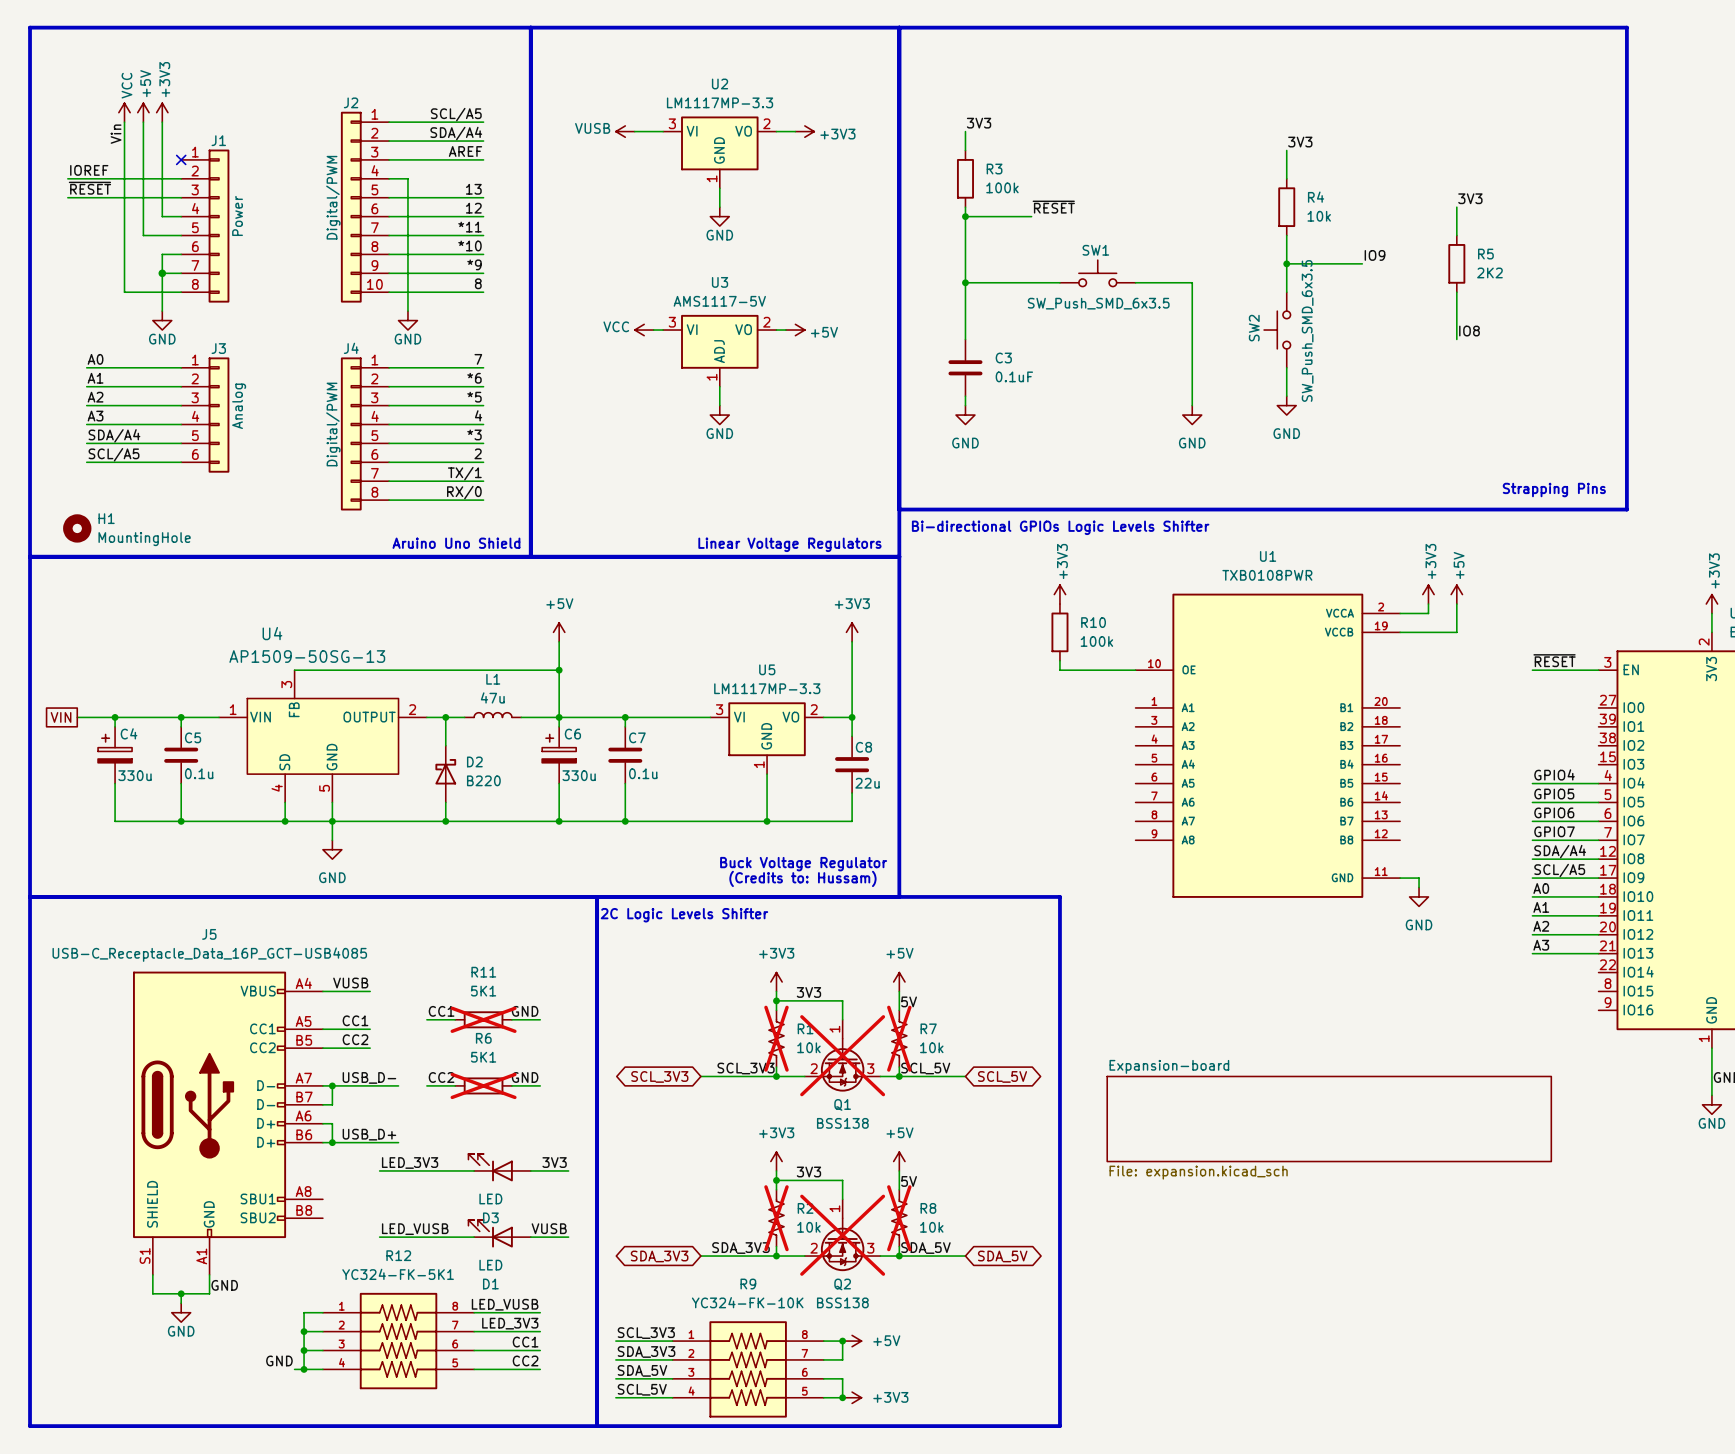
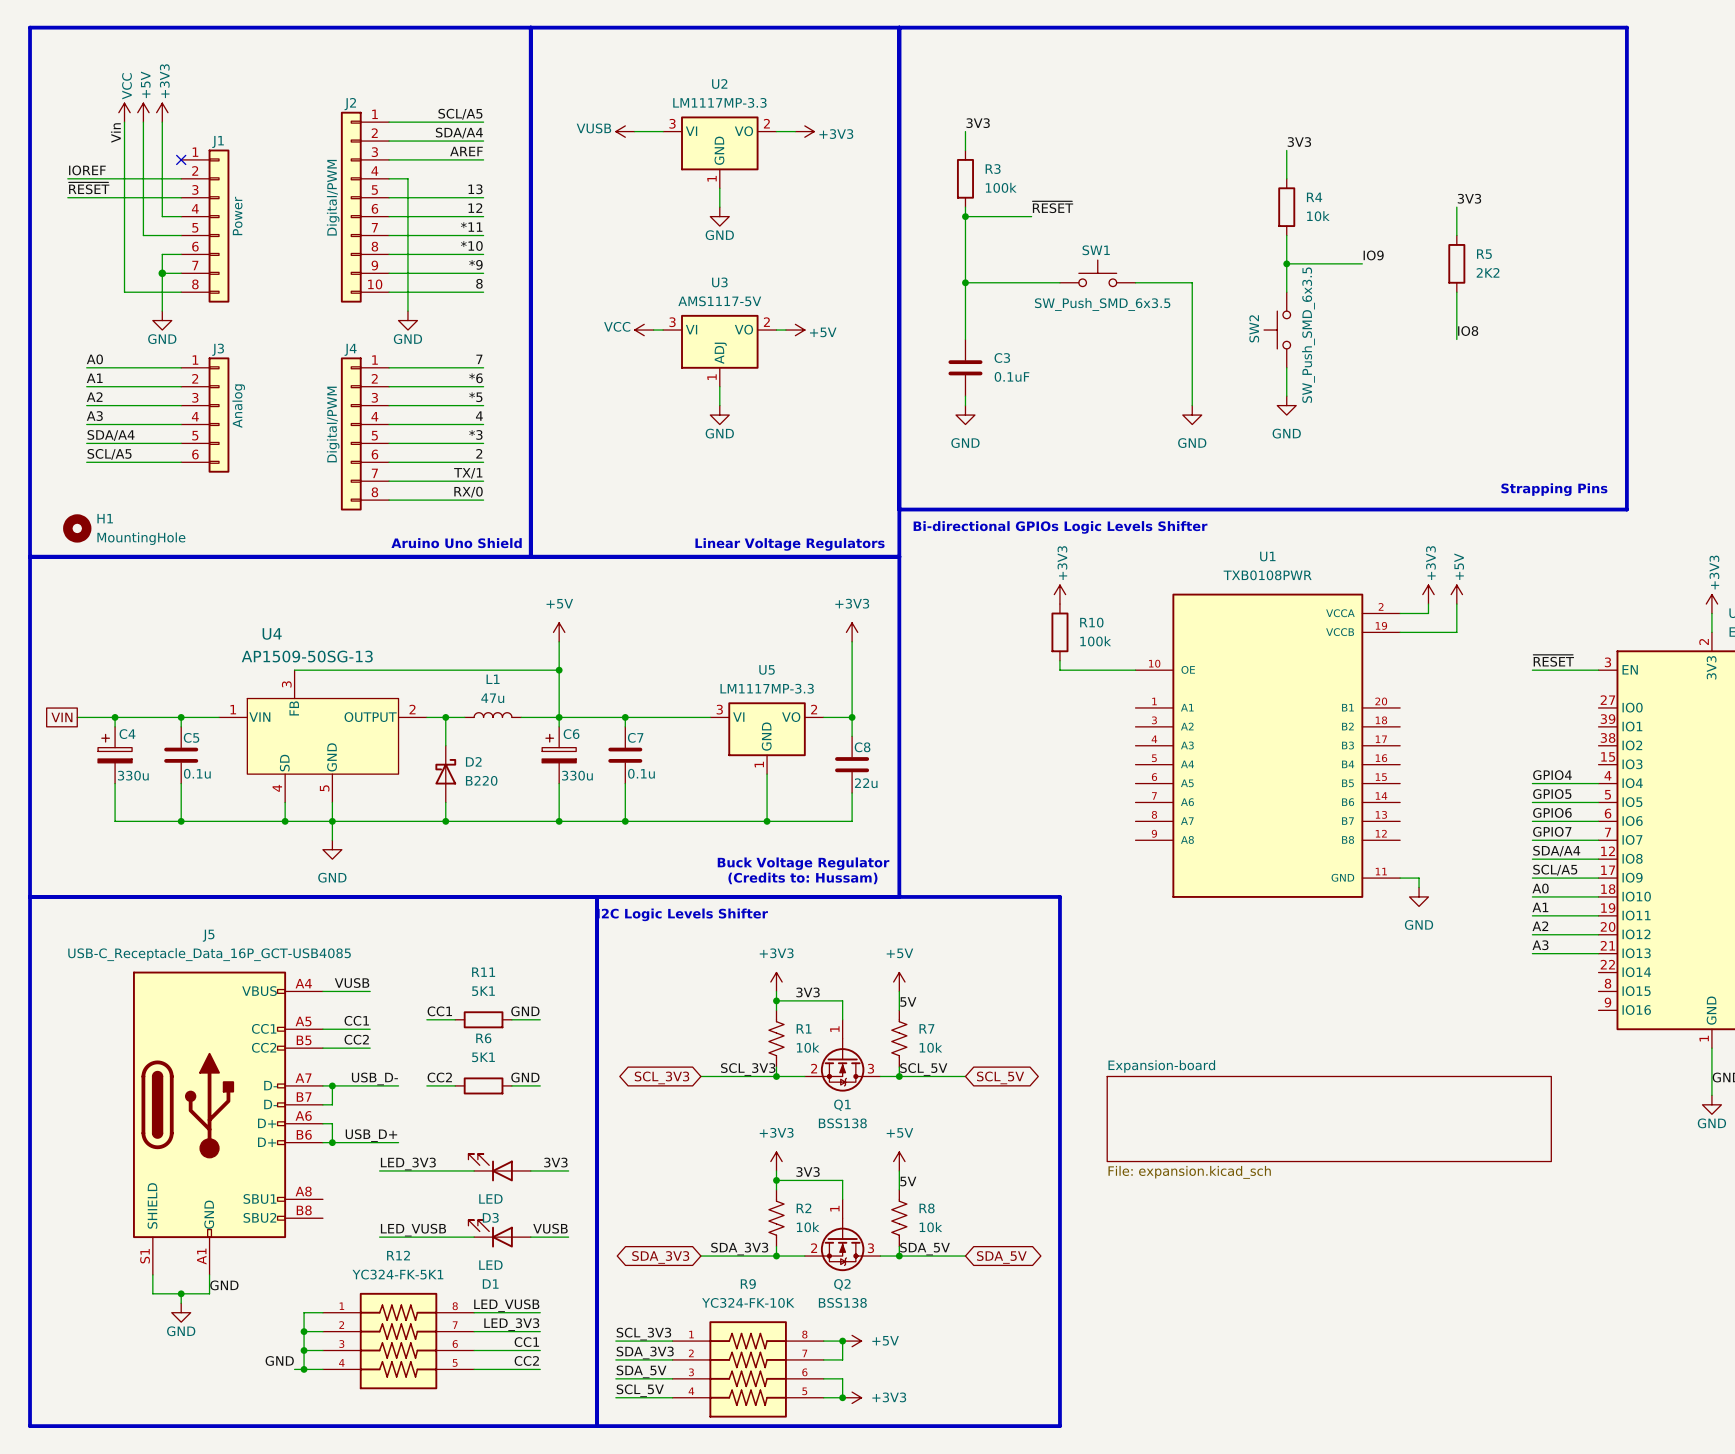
R11 do-not-place cross: (483, 1019) -> none
R1 do-not-place cross: (776, 1038) -> none
R7 do-not-place cross: (899, 1038) -> none
Q1 do-not-place cross: (842, 1055) -> none
R6 do-not-place cross: (483, 1085) -> none
R2 do-not-place cross: (776, 1218) -> none
R8 do-not-place cross: (899, 1218) -> none
Q2 do-not-place cross: (842, 1235) -> none

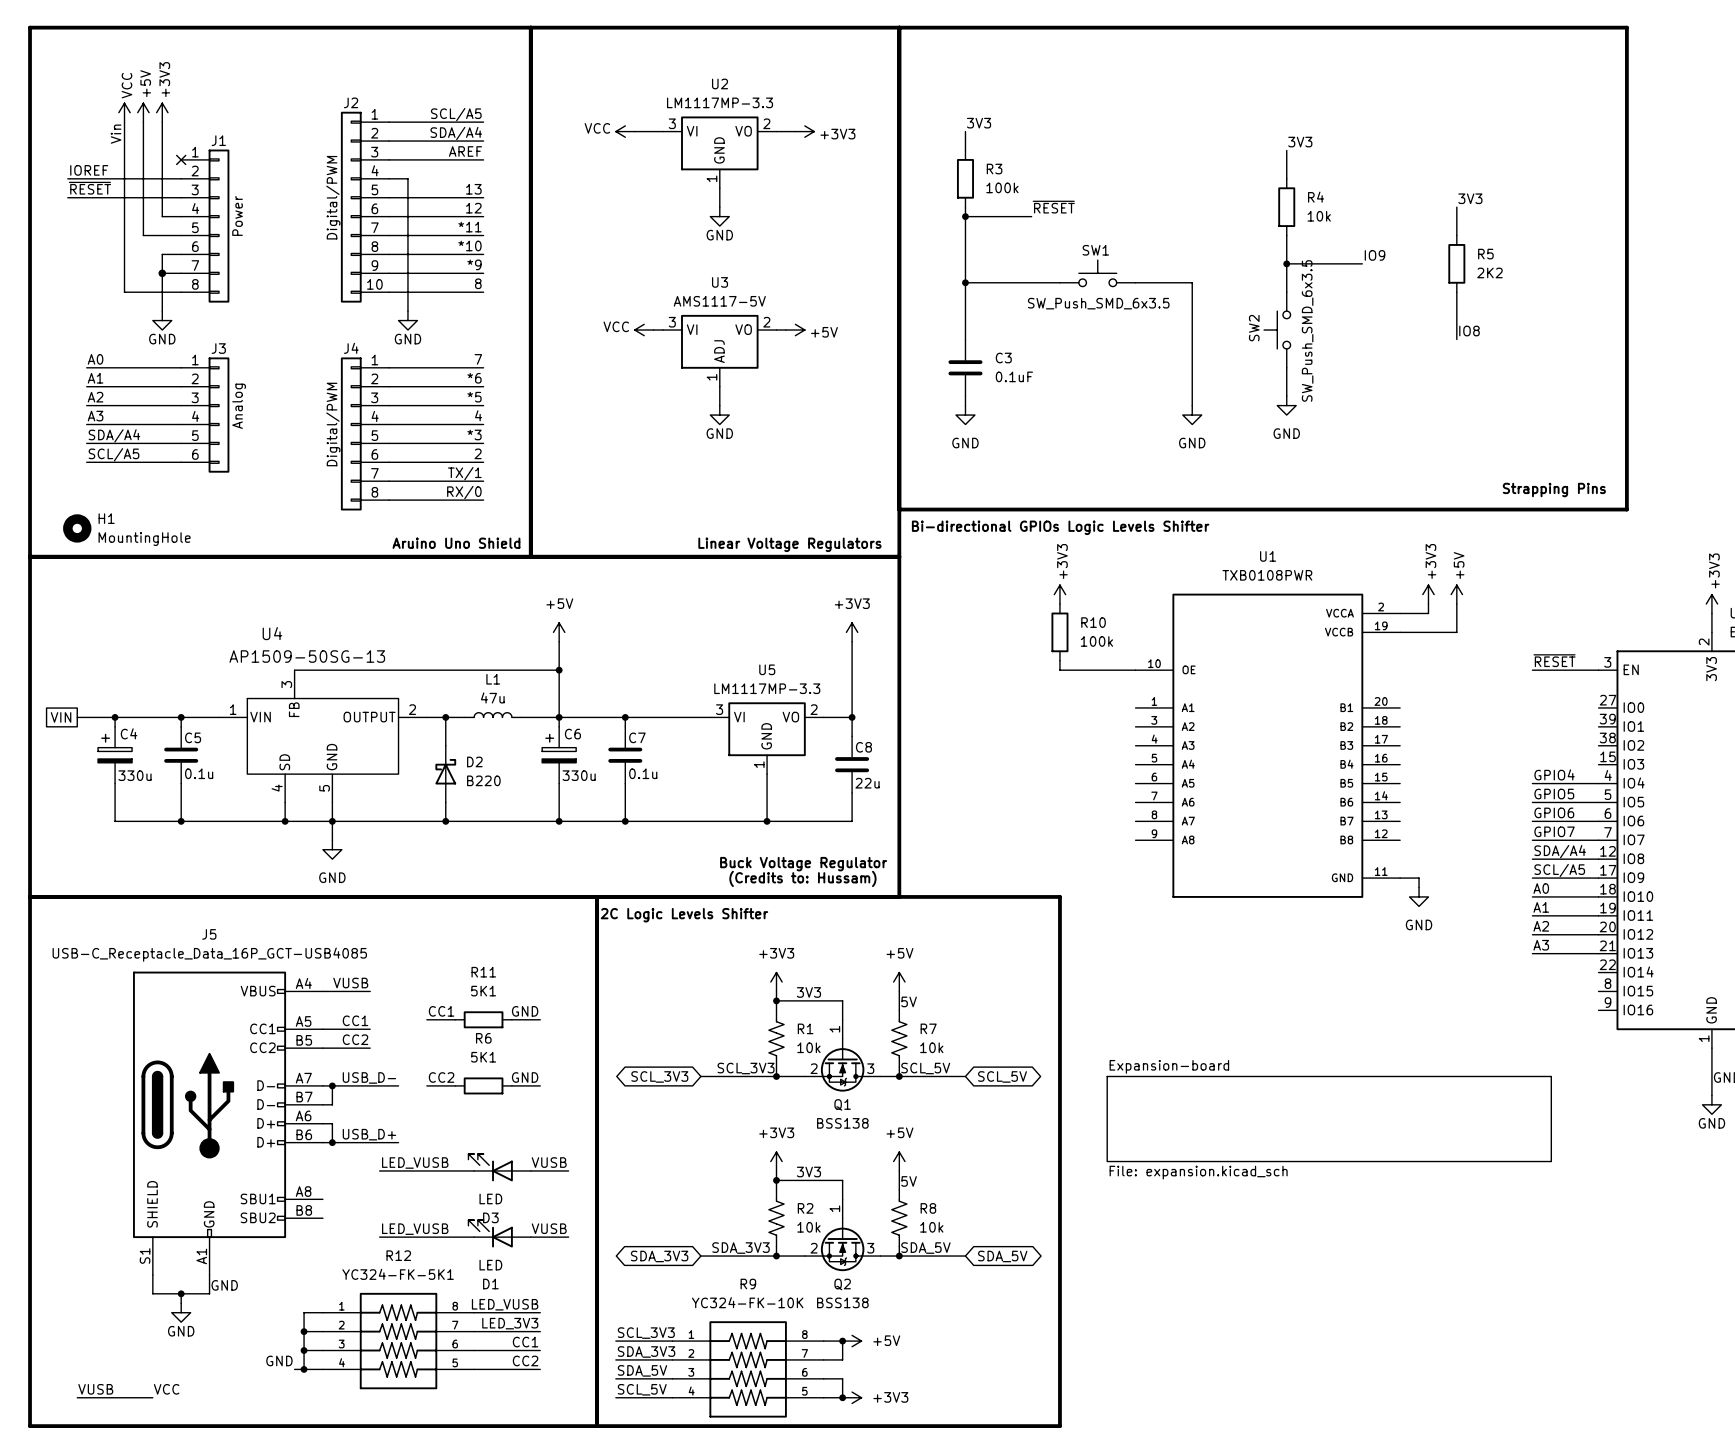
power symbol: VUSB (625, 131) -> VCC (625, 131)
label: 3V3 (555, 1162) -> VUSB (549, 1162)
label: LED_3V3 (408, 1163) -> LED_VUSB (415, 1162)
label: none -> VUSB (95, 1389)
label: none -> VCC (166, 1389)
wire: none -> (77, 1397) (152, 1397)

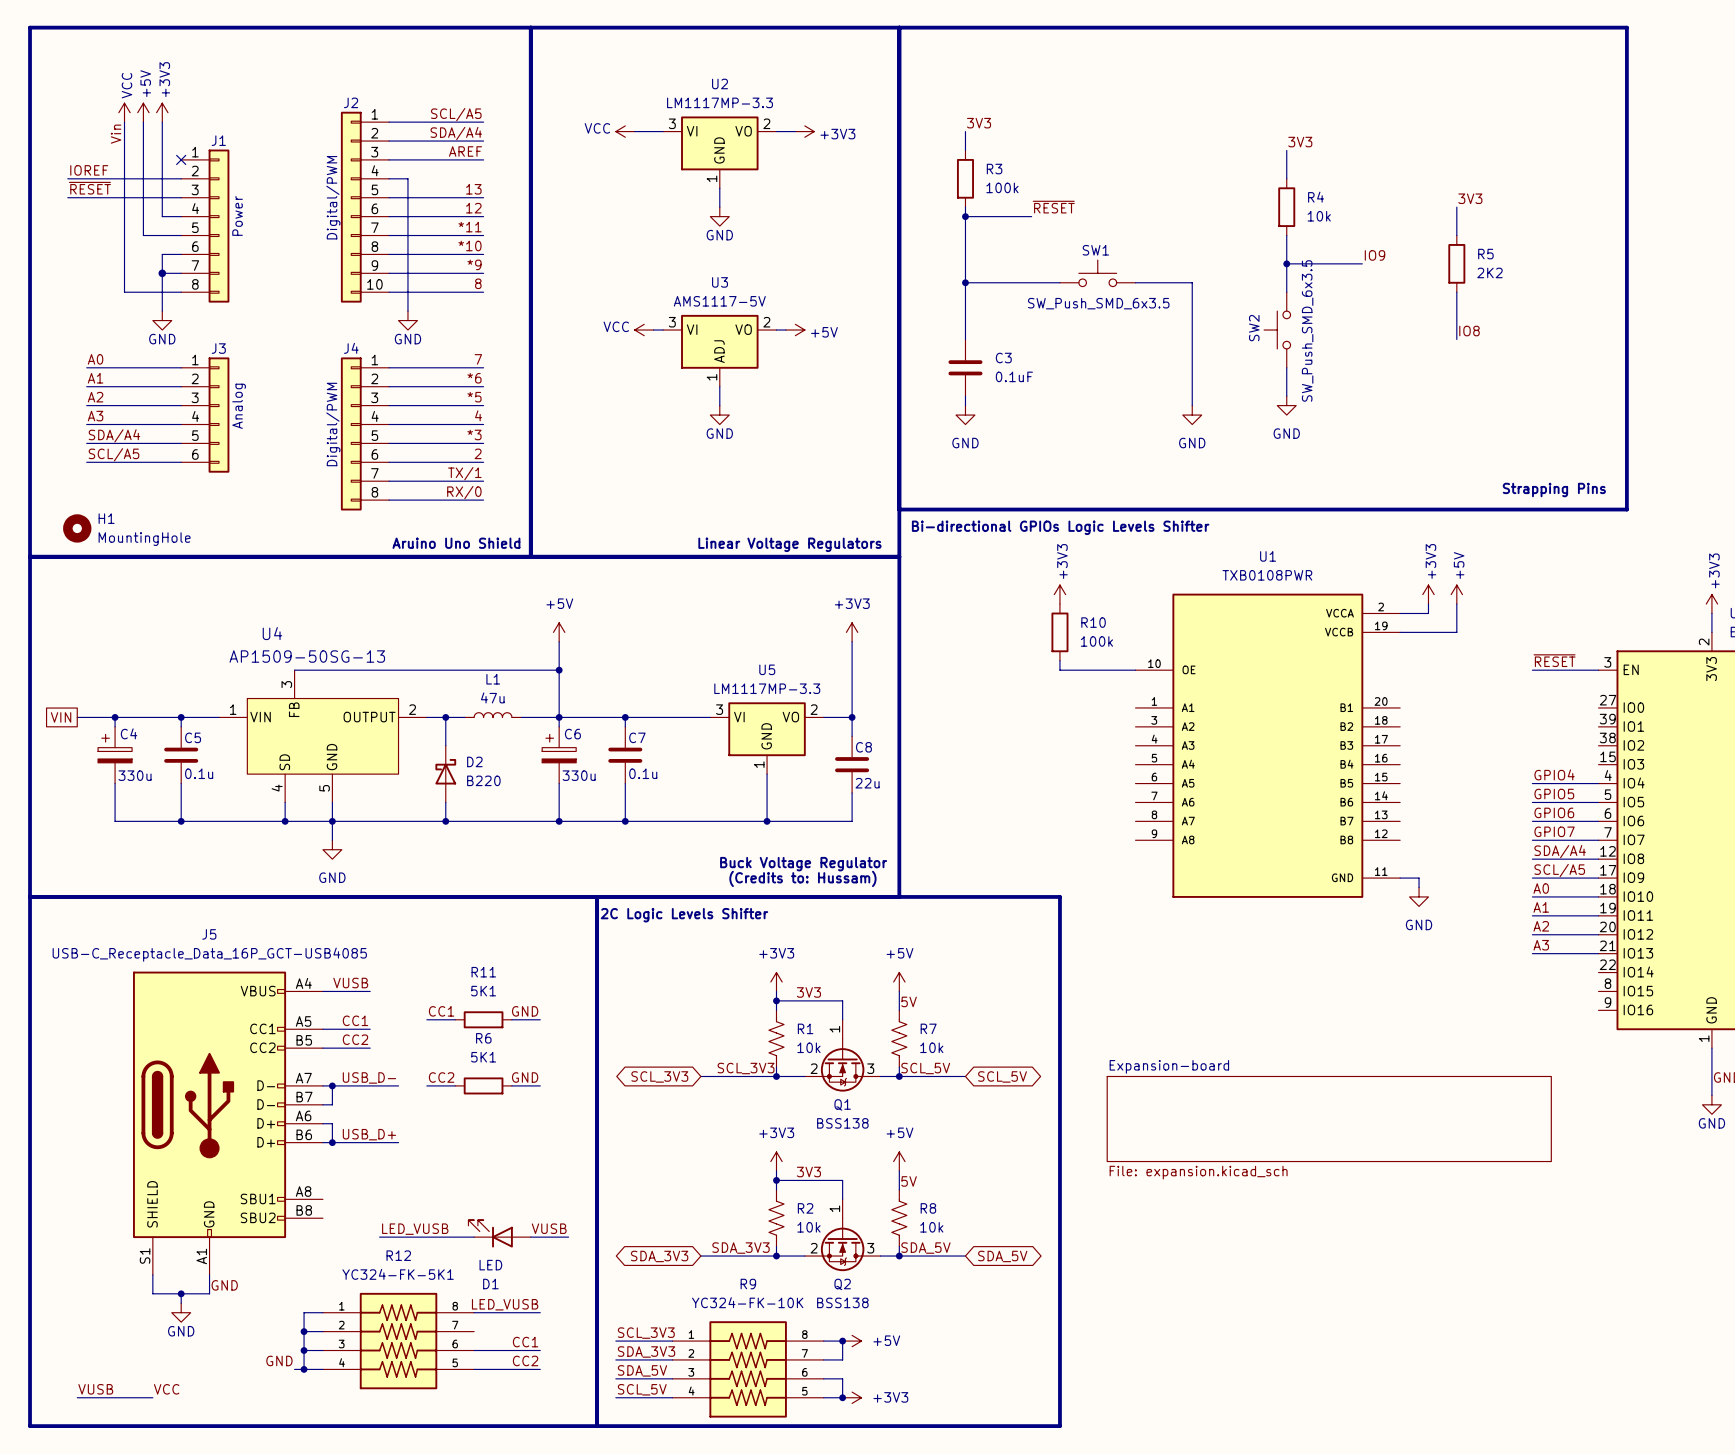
label: LED_VUSB (415, 1162) -> none
label: VUSB (549, 1162) -> none
D3: LED (499, 1167) -> none
wire: (379, 1170) (474, 1170) -> none
wire: (530, 1170) (568, 1170) -> none
label: LED_3V3 (510, 1323) -> none
wire: (474, 1331) (540, 1331) -> none

